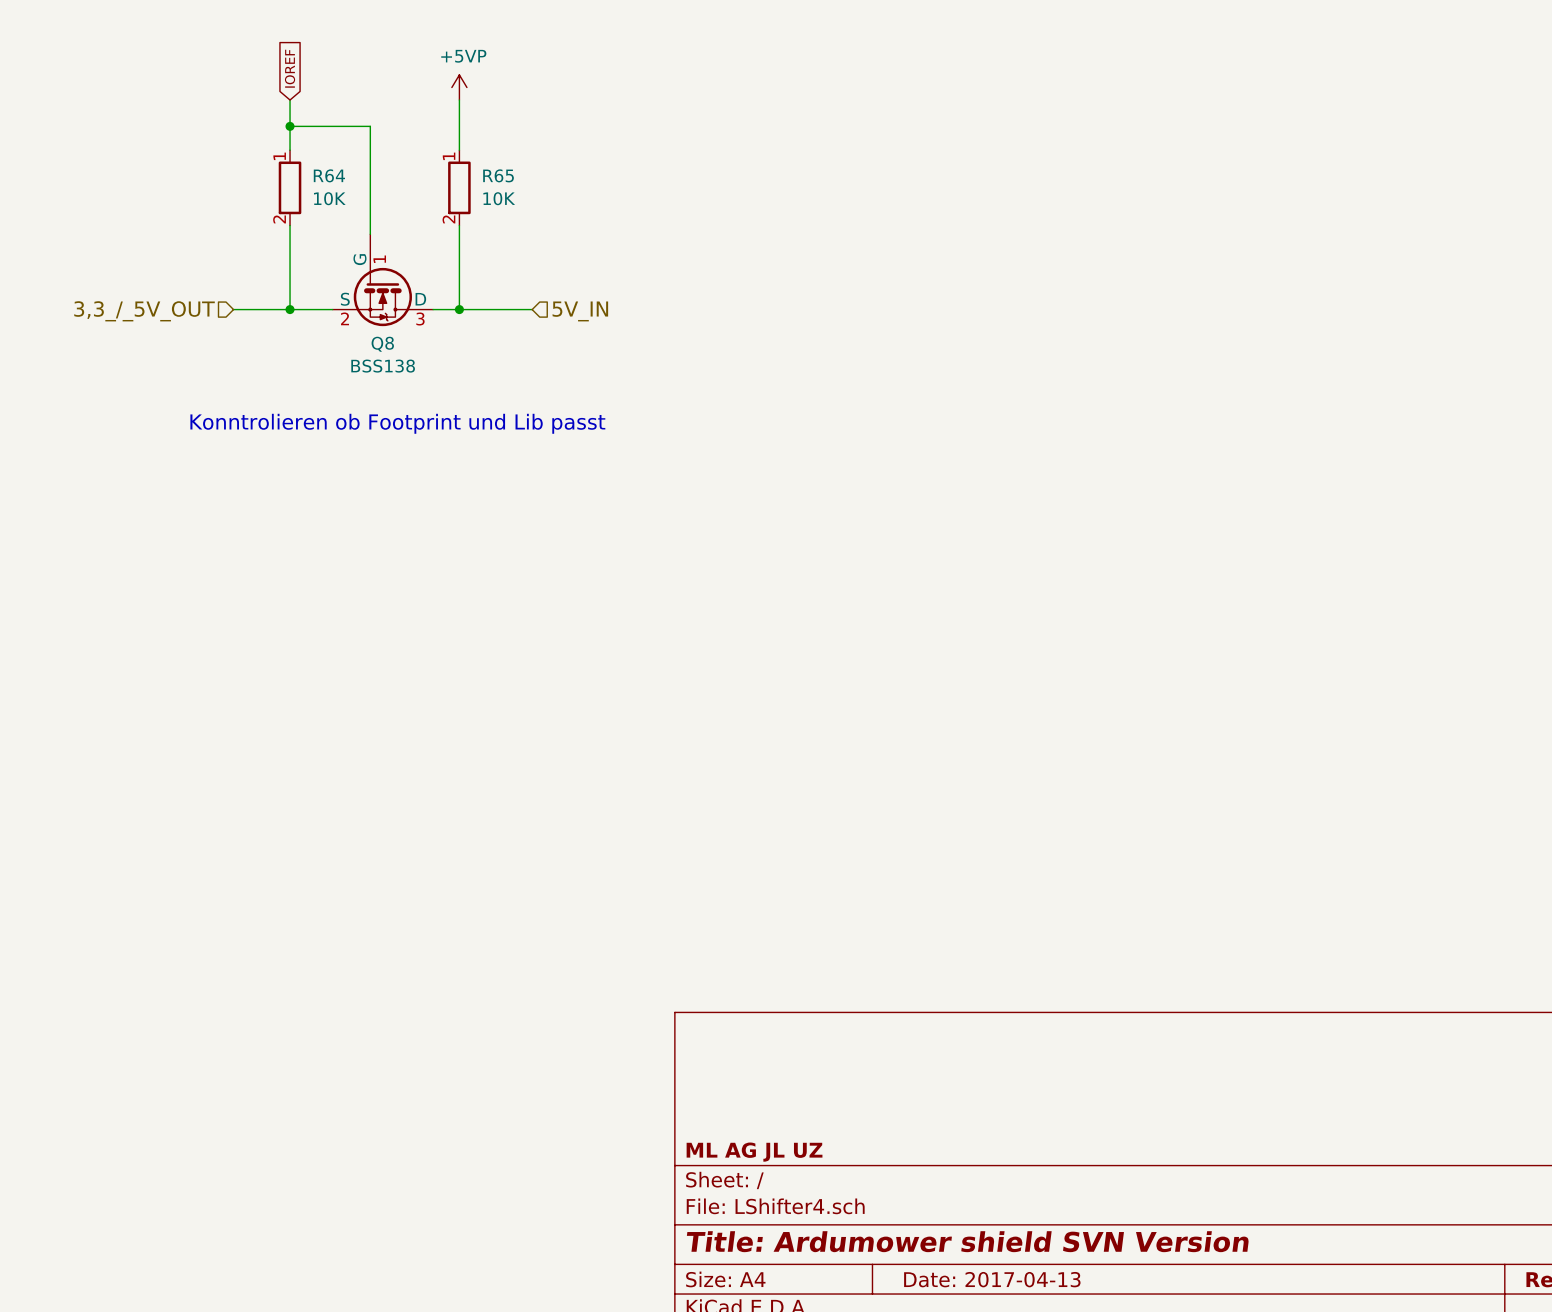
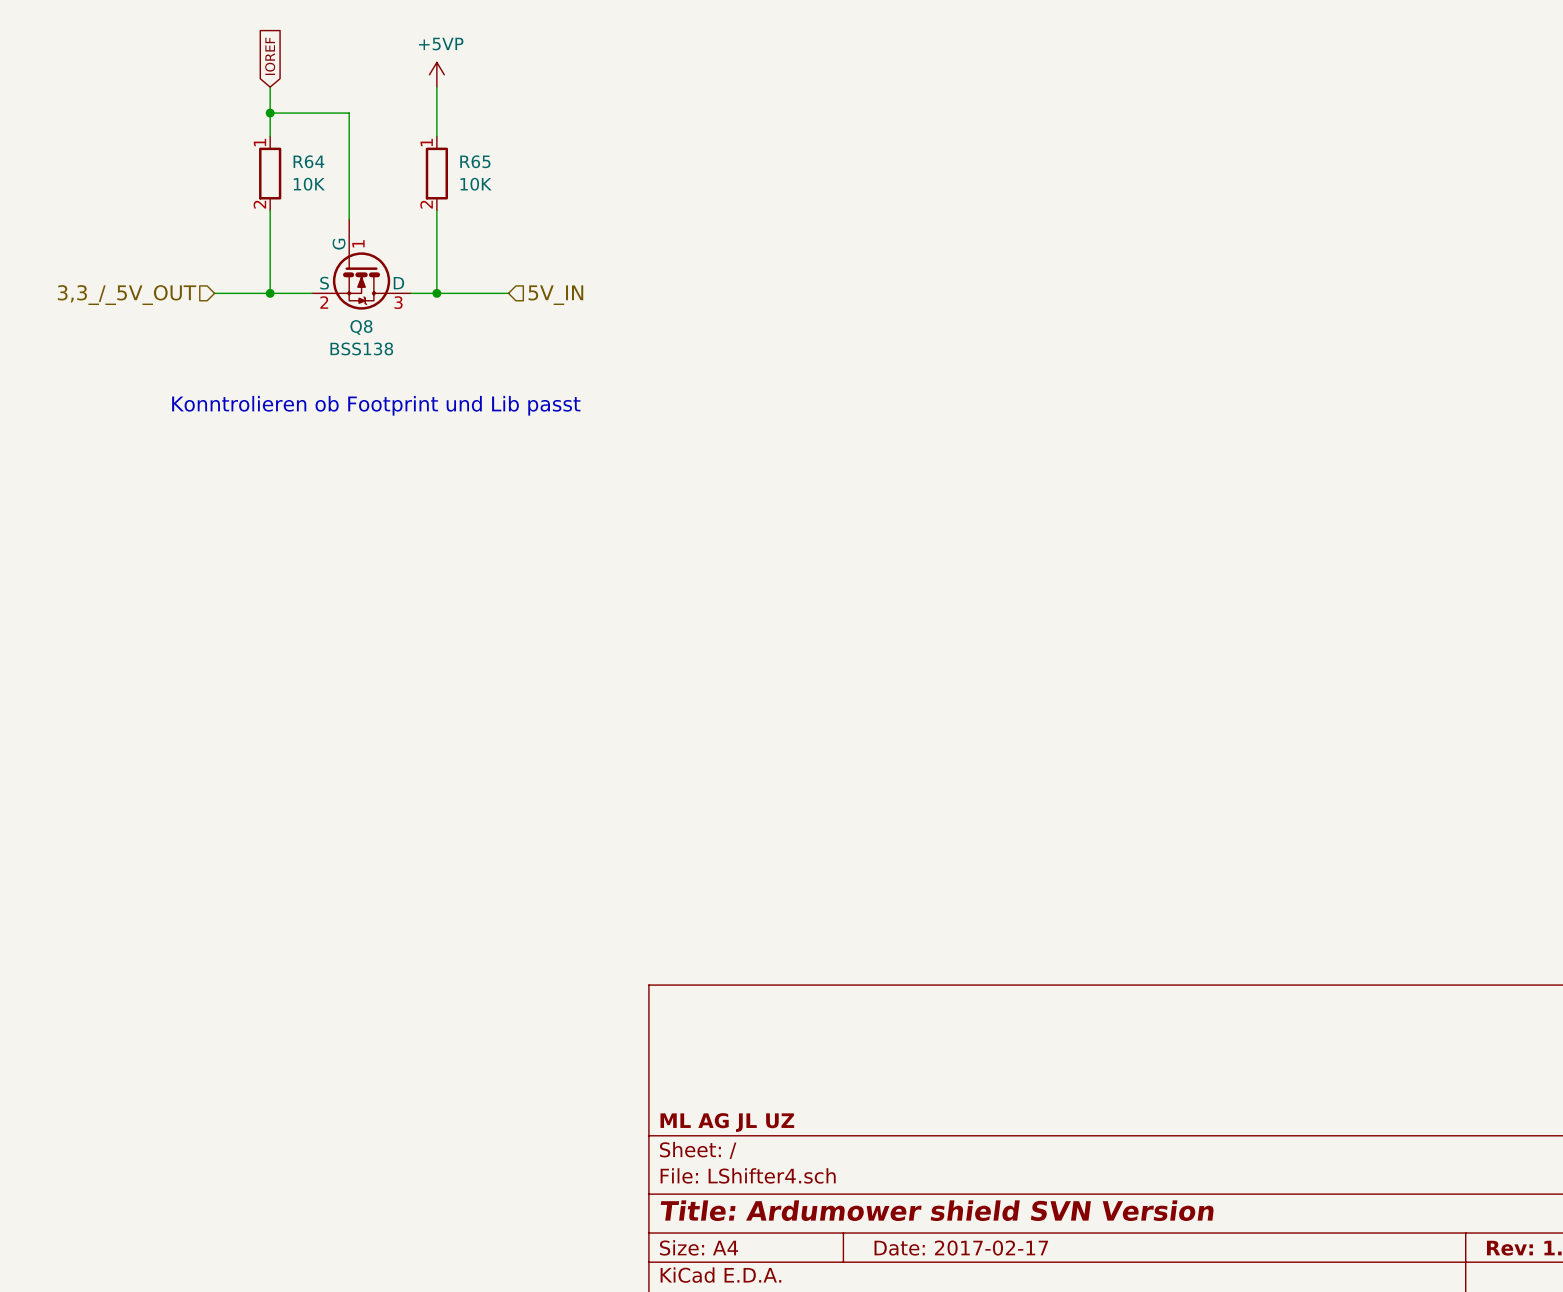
title block: Date: 2017-04-13 (992, 1279) -> Date: 2017-02-17 (961, 1248)

